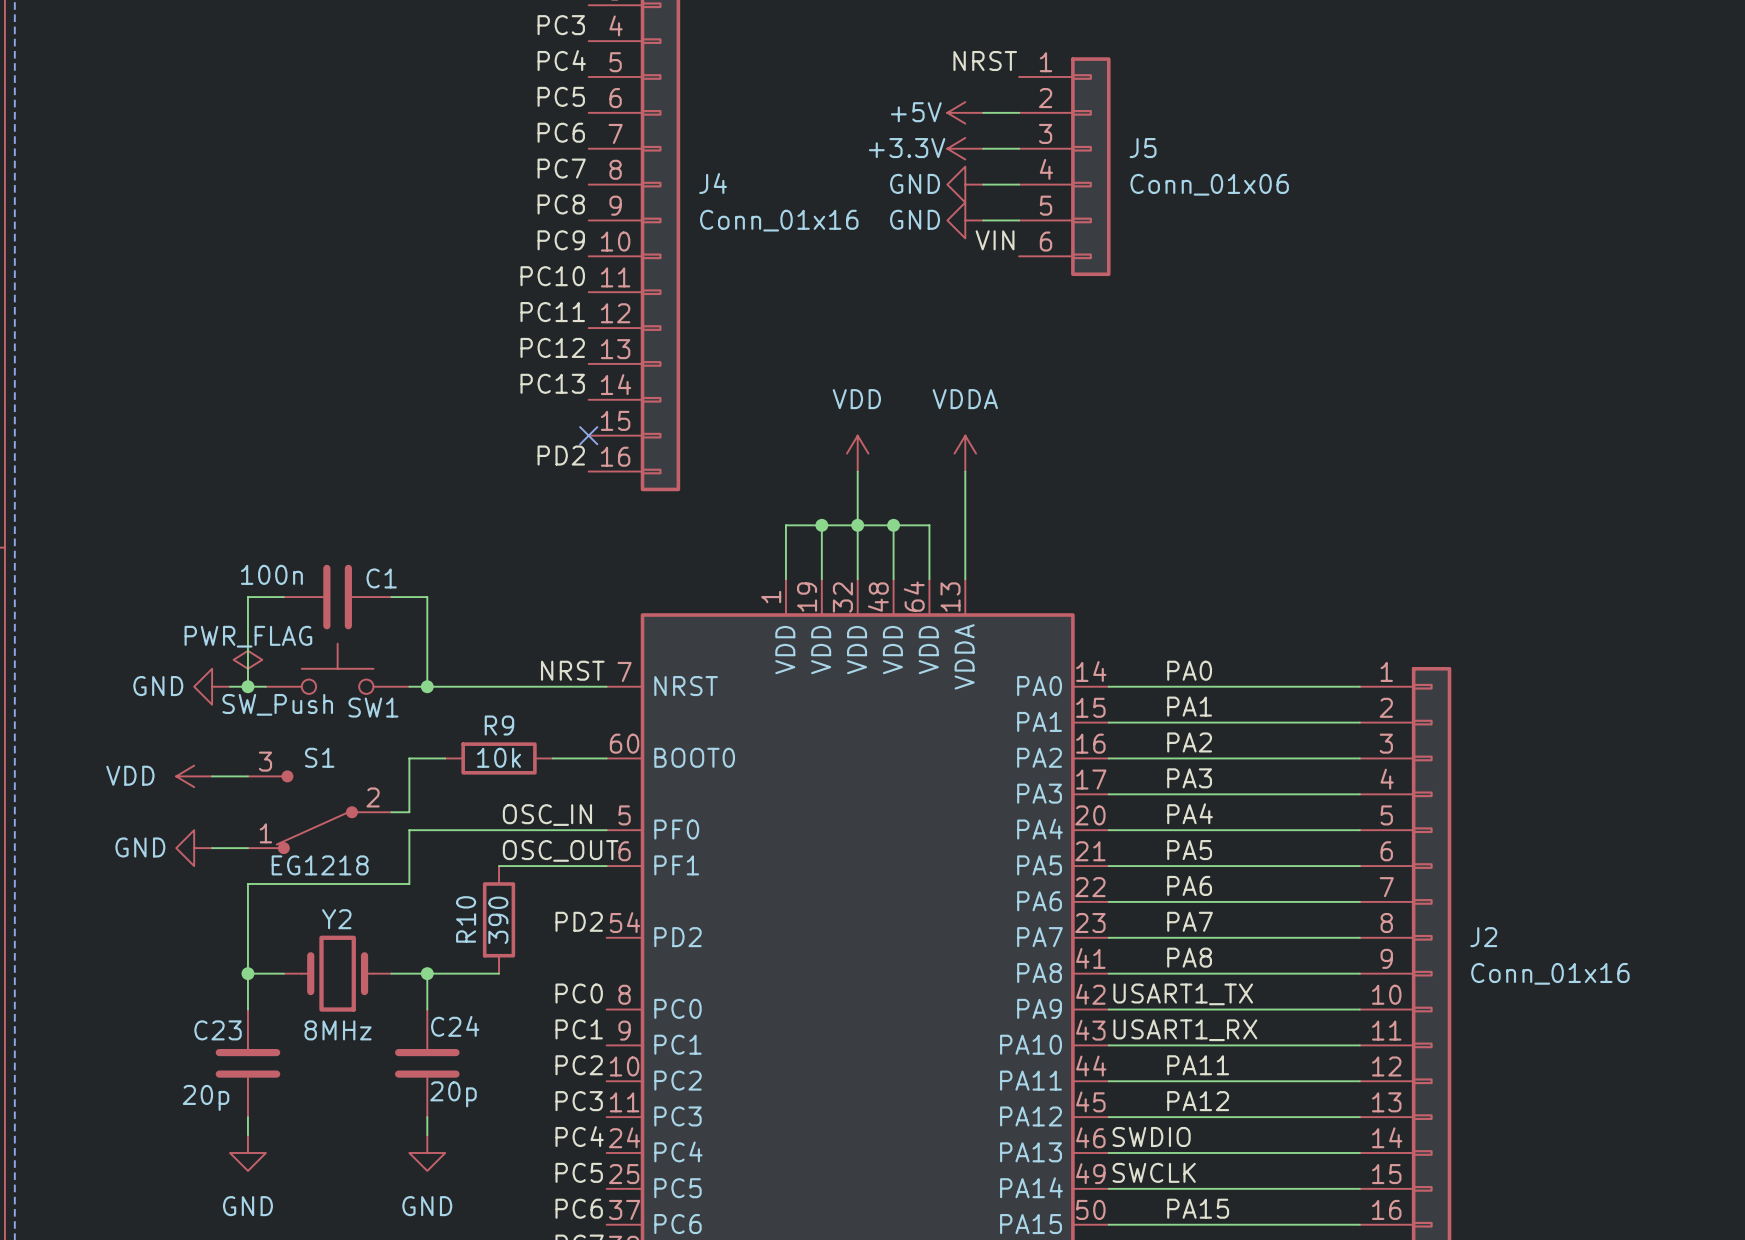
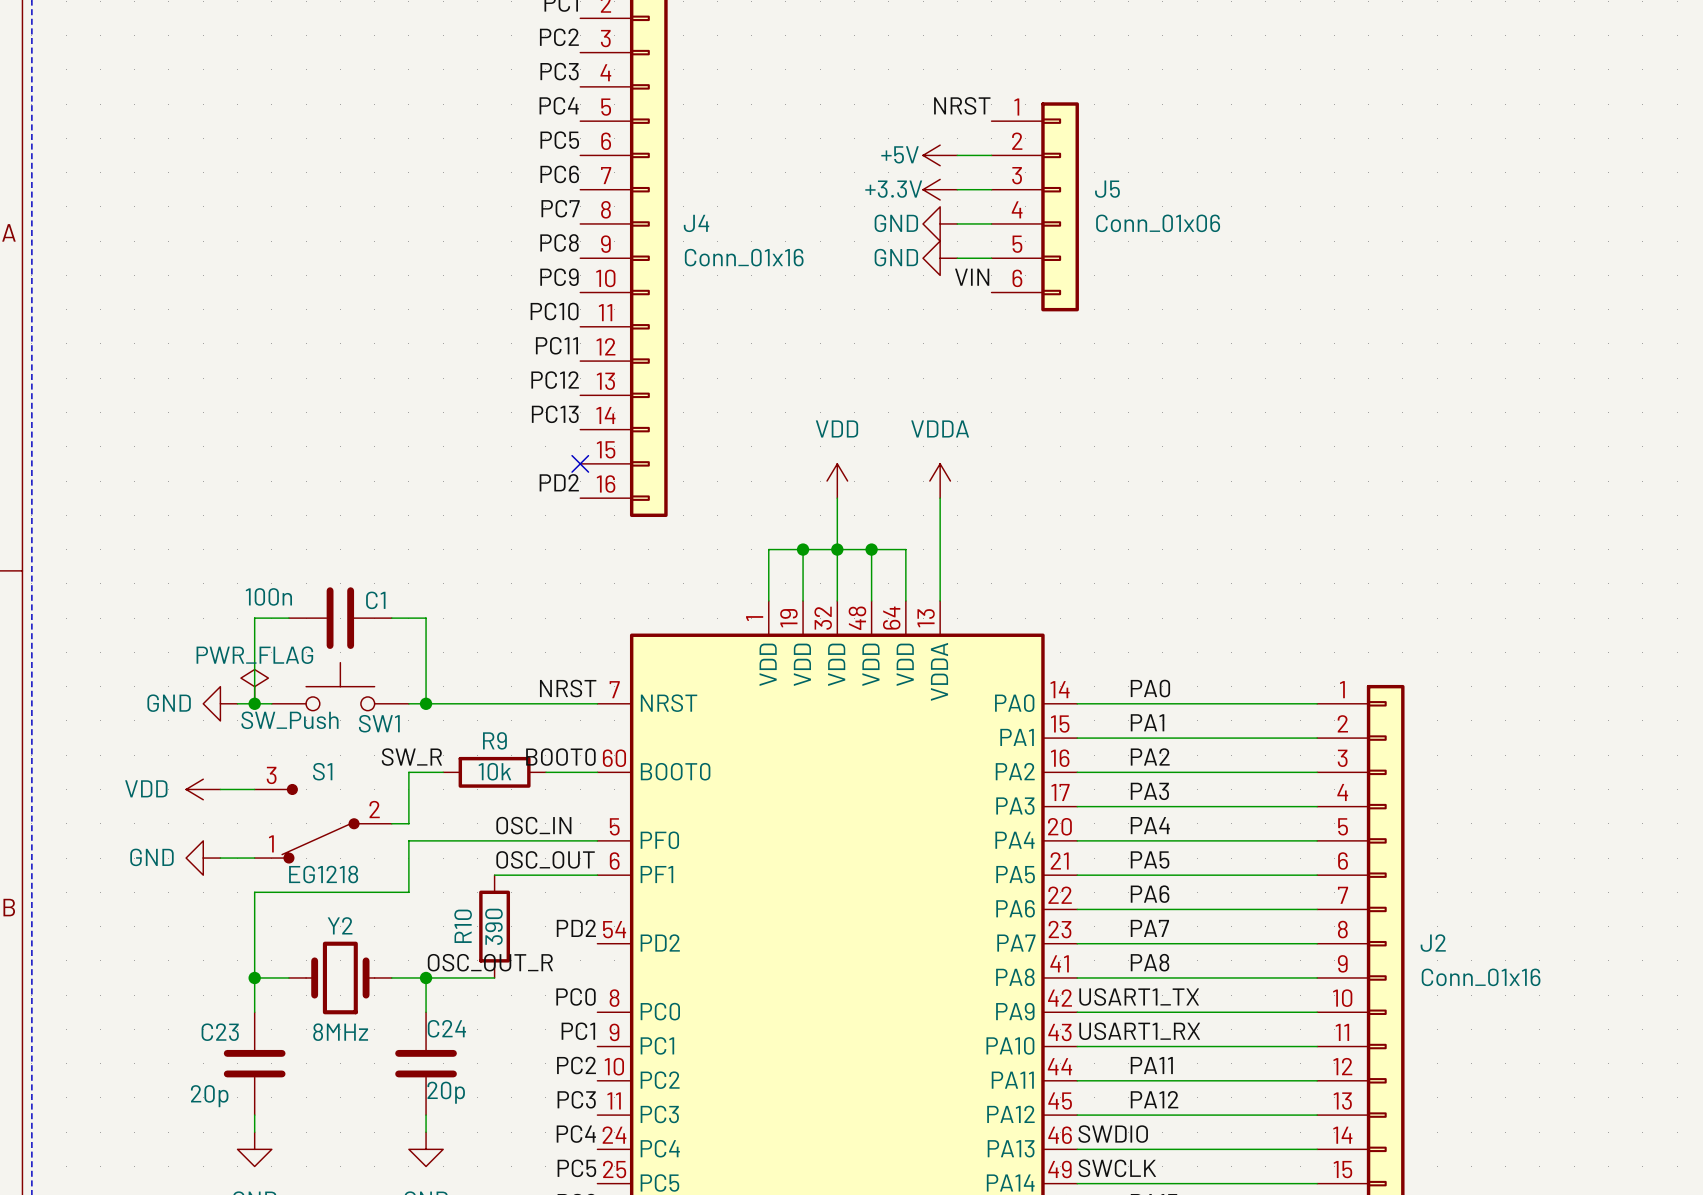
label: none -> BOOT0 (560, 757)
label: none -> SW_R (411, 757)
label: none -> OSC_OUT_R (490, 962)

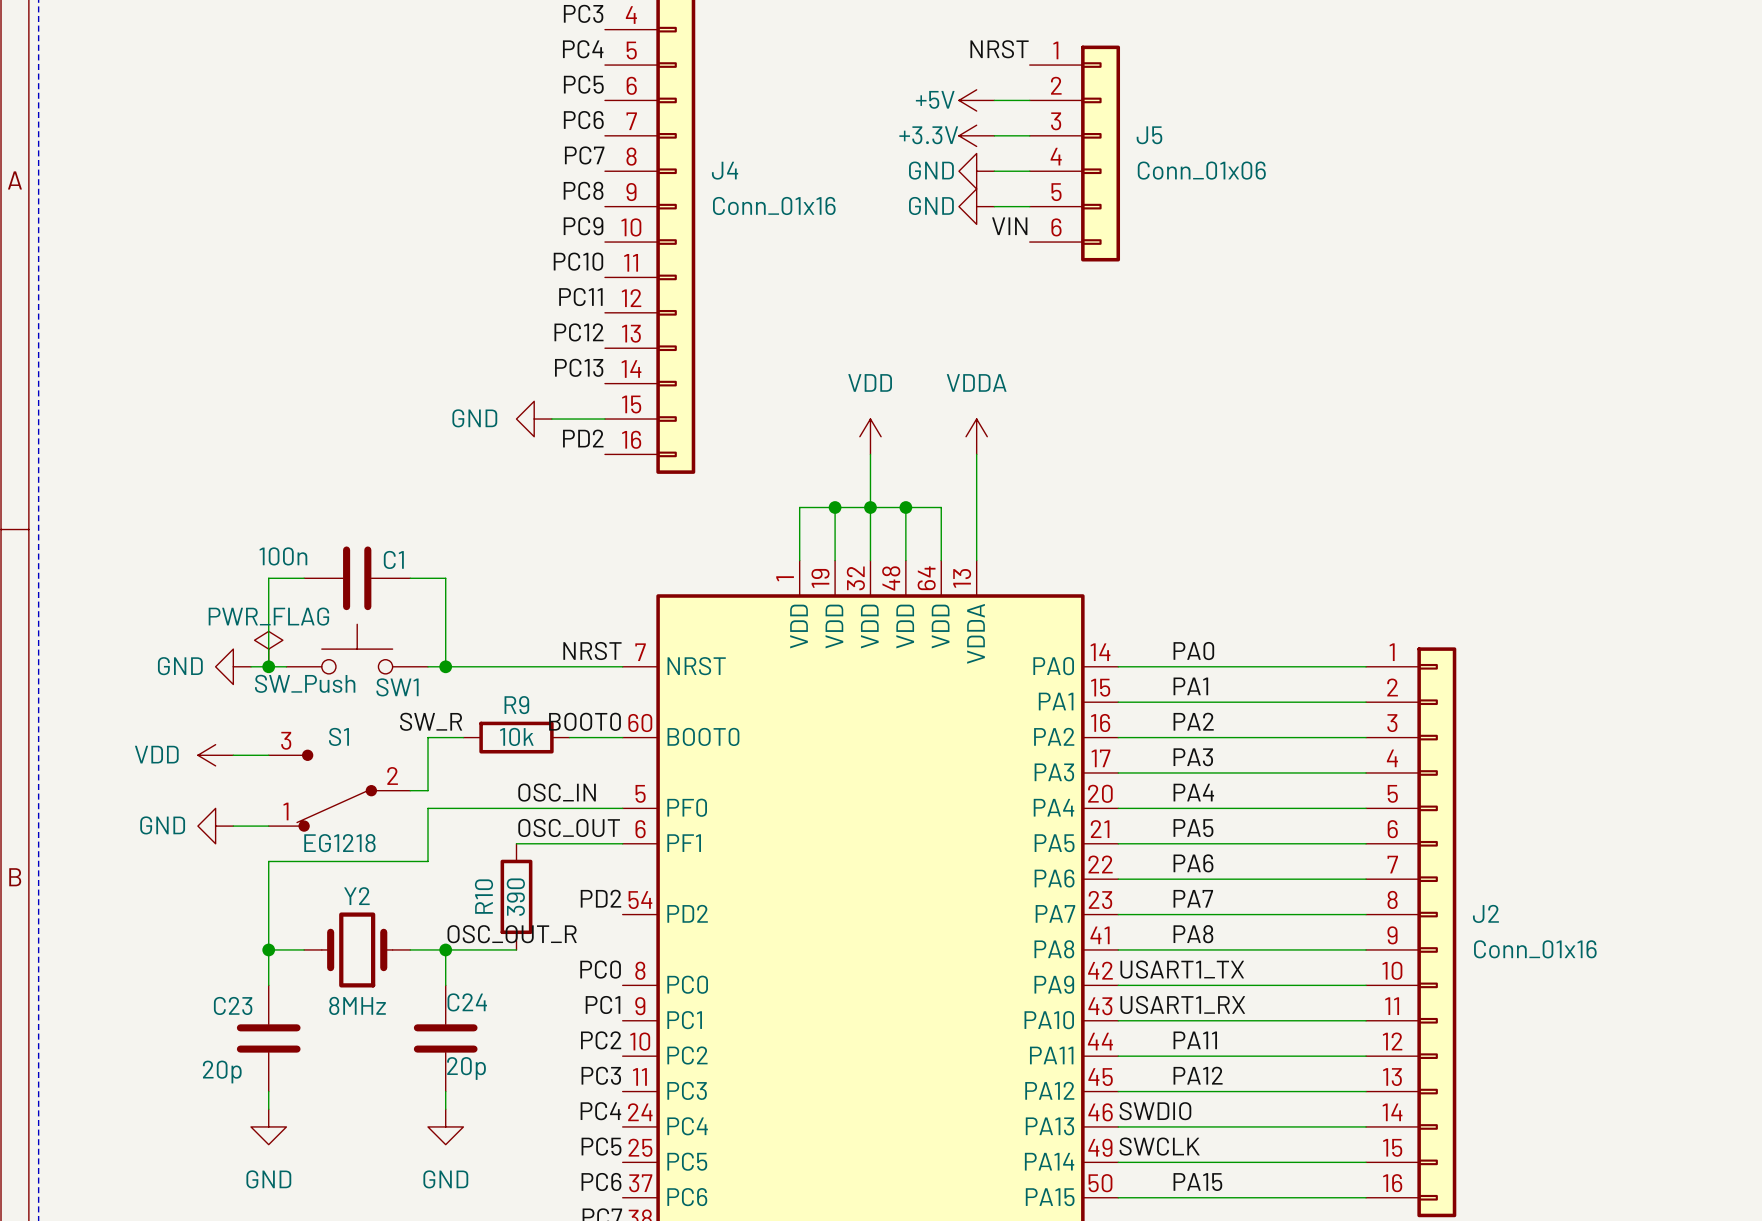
power symbol: none -> GND (534, 419)
wire: none -> (551, 419) (604, 419)
no-connect mark: (580, 463) -> none

